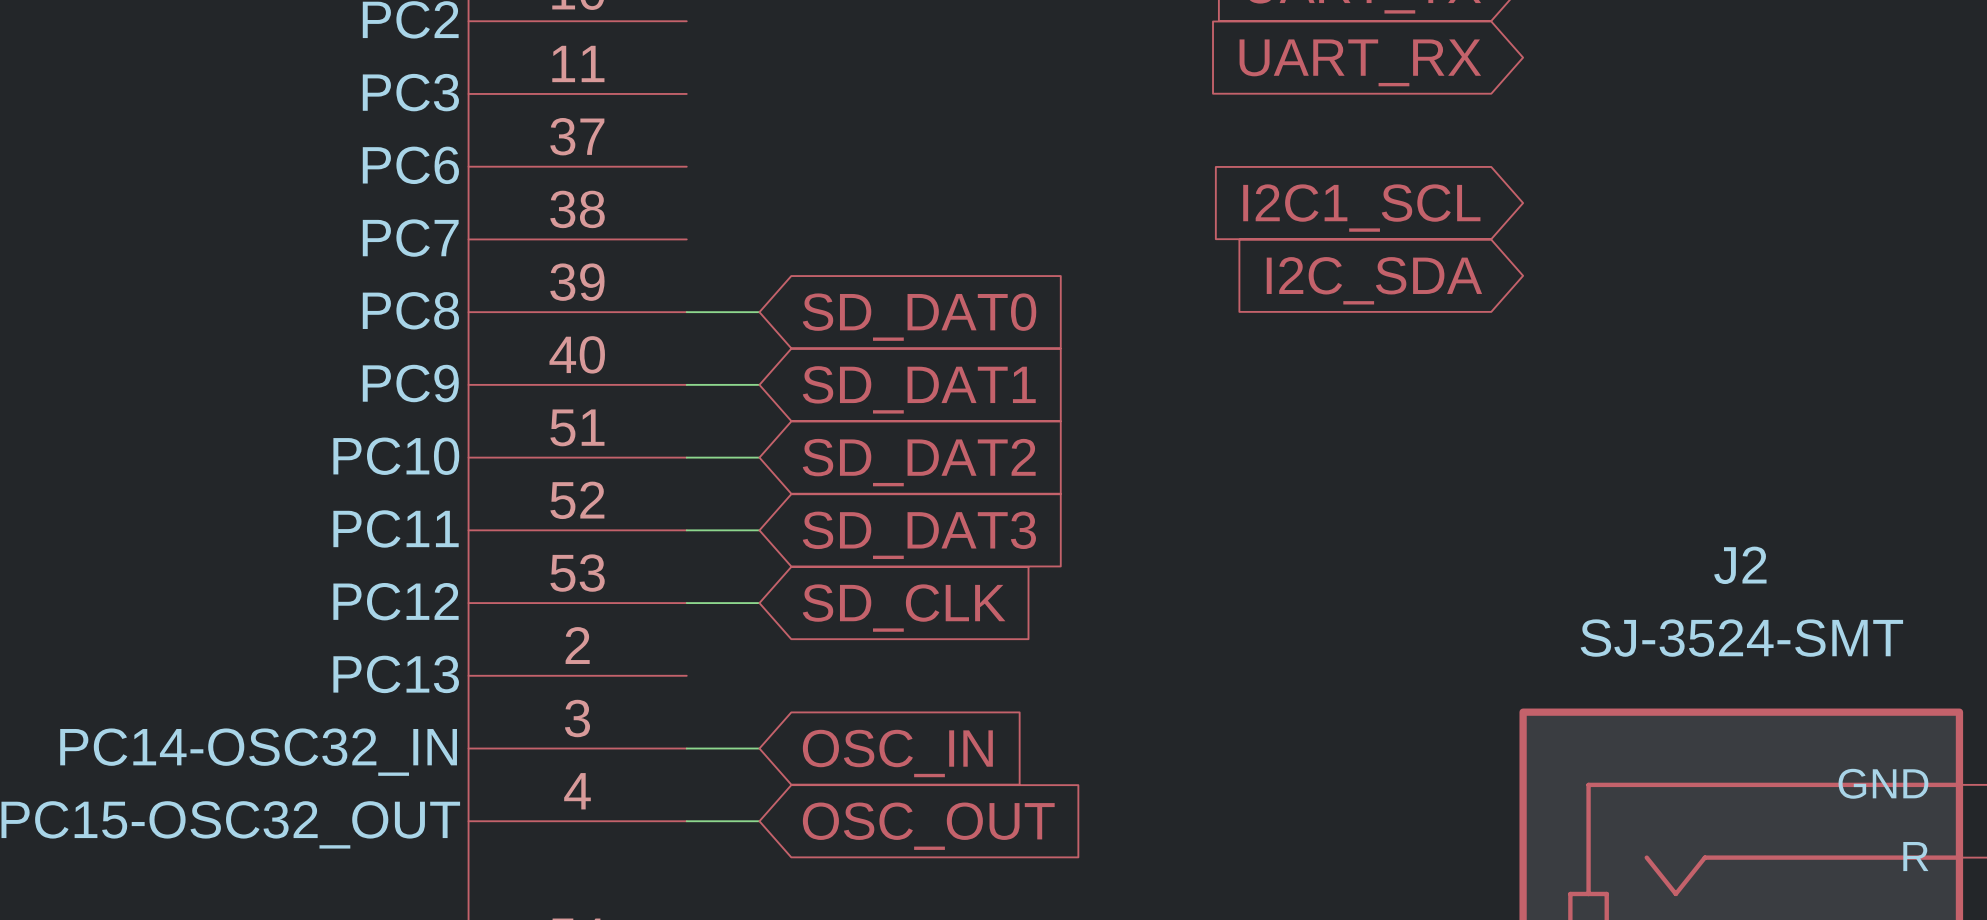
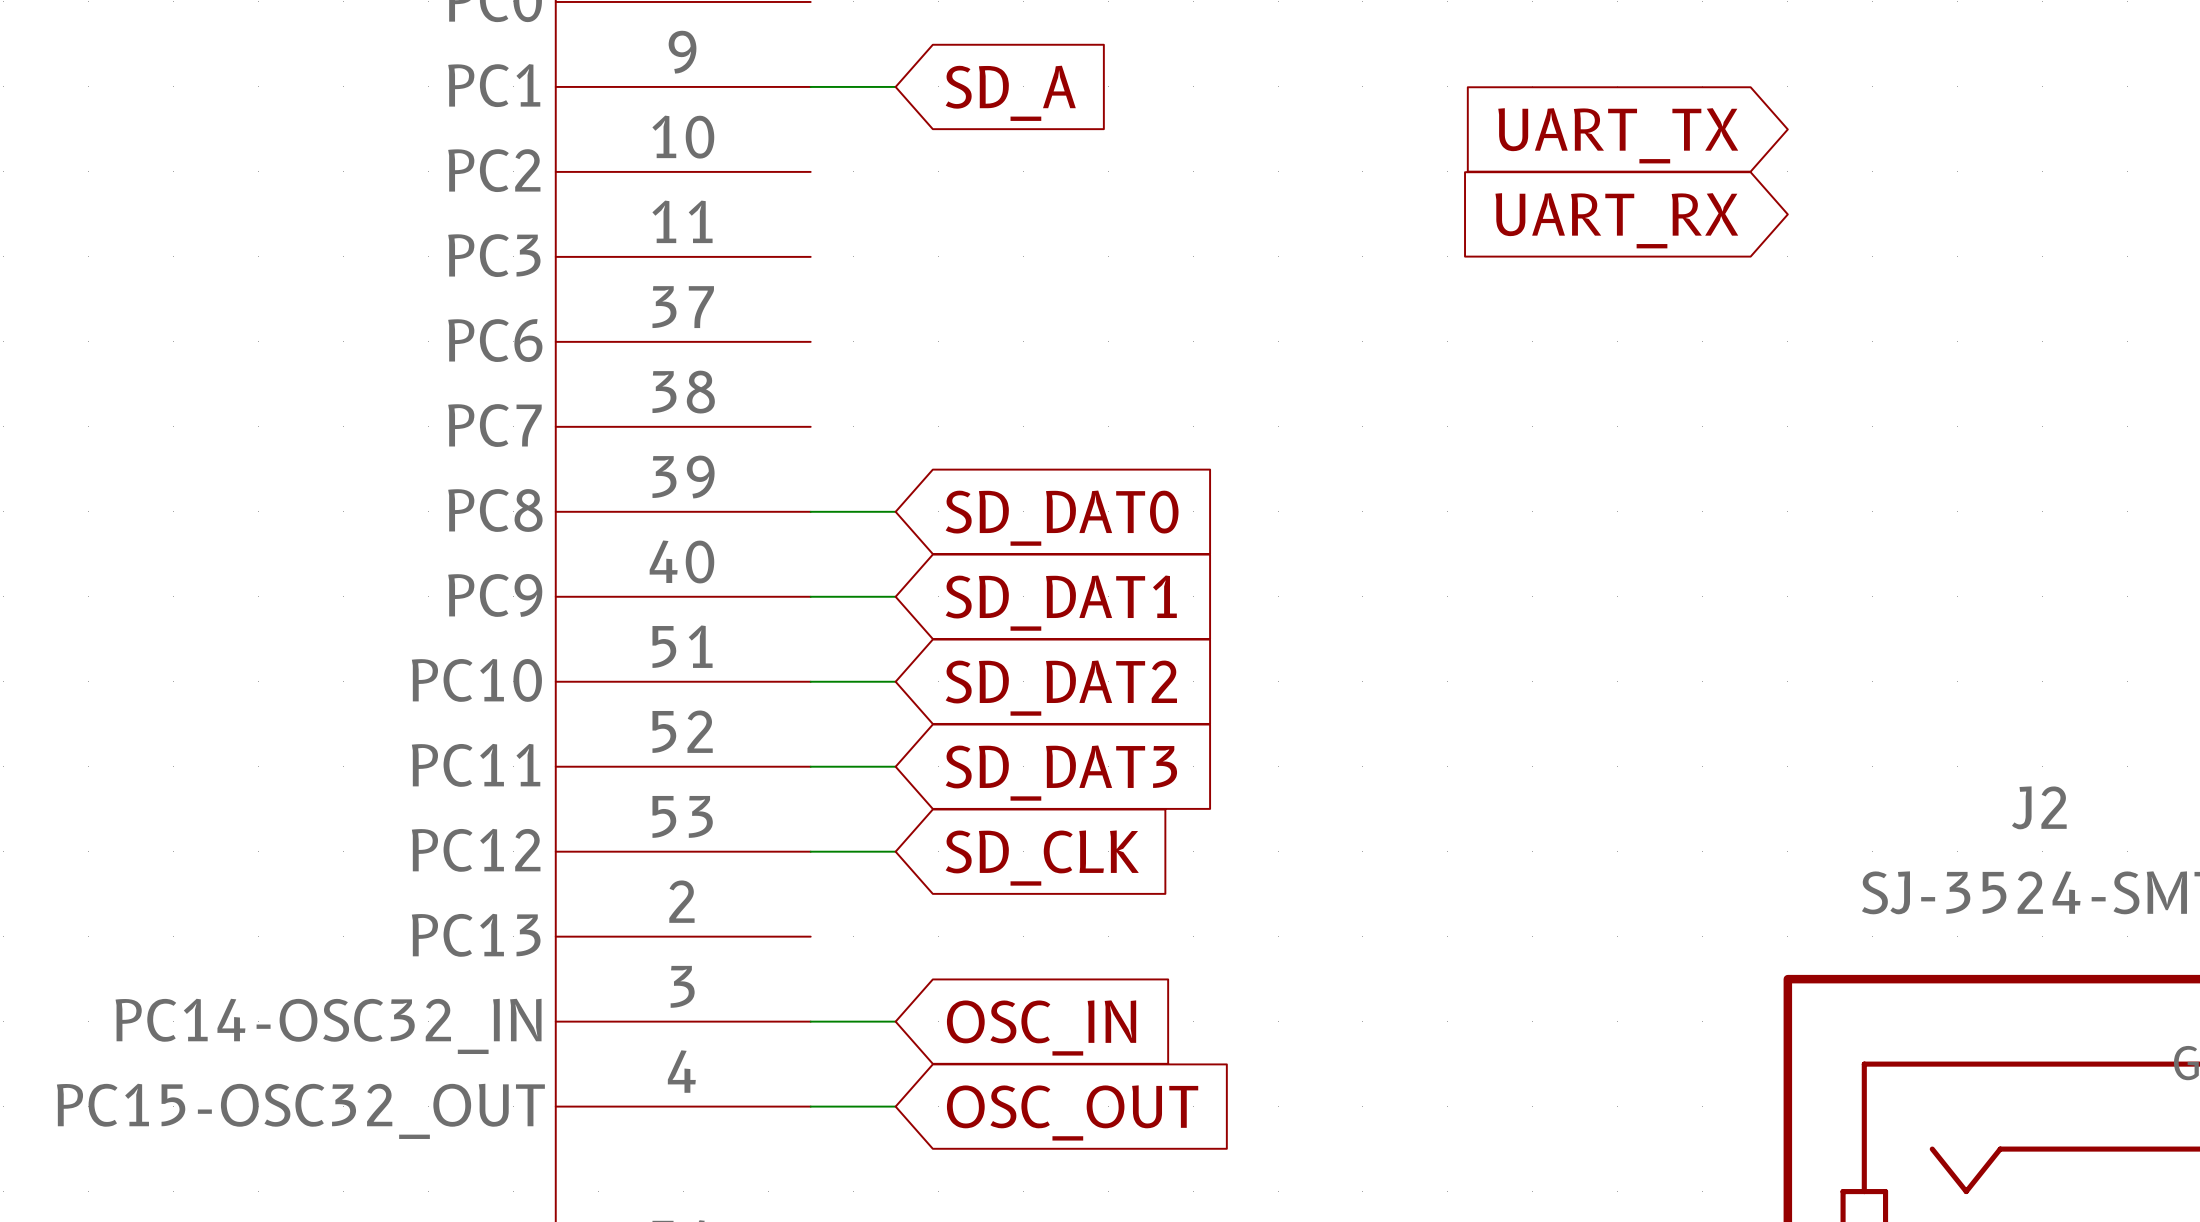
global label: I2C1_SCL (1361, 208) -> none
global label: I2C_SDA (1374, 280) -> none

